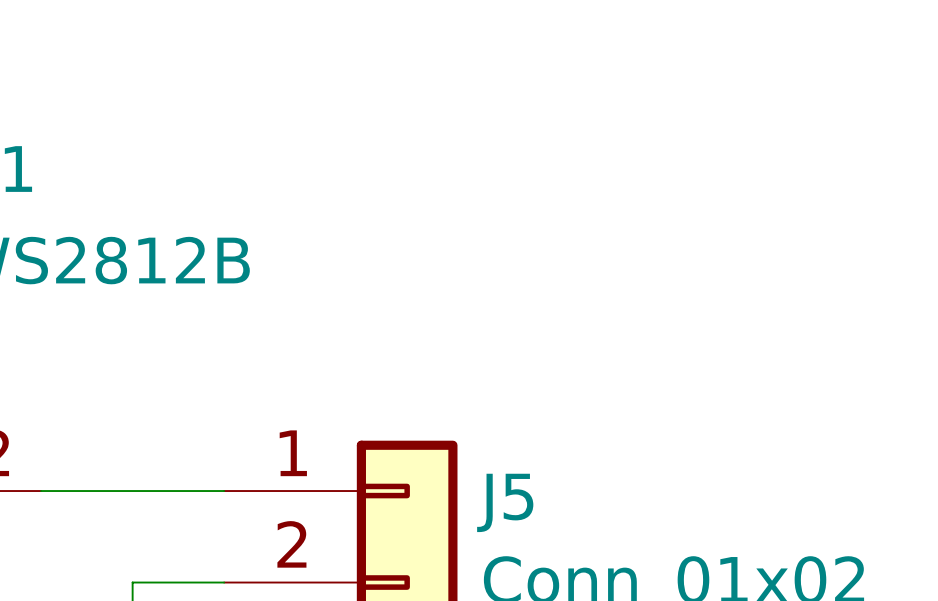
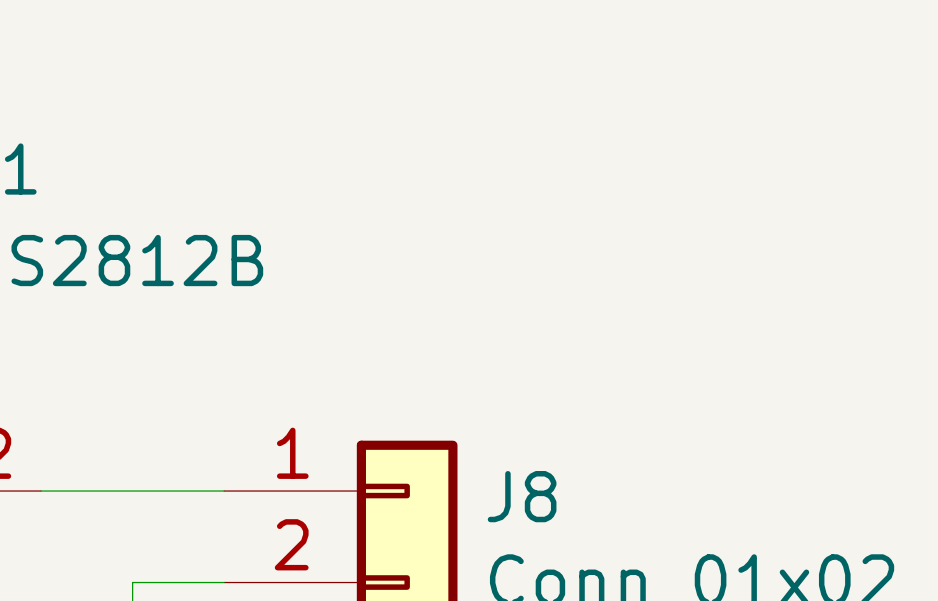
J5 name: J5 (505, 502) -> J8 (522, 496)

